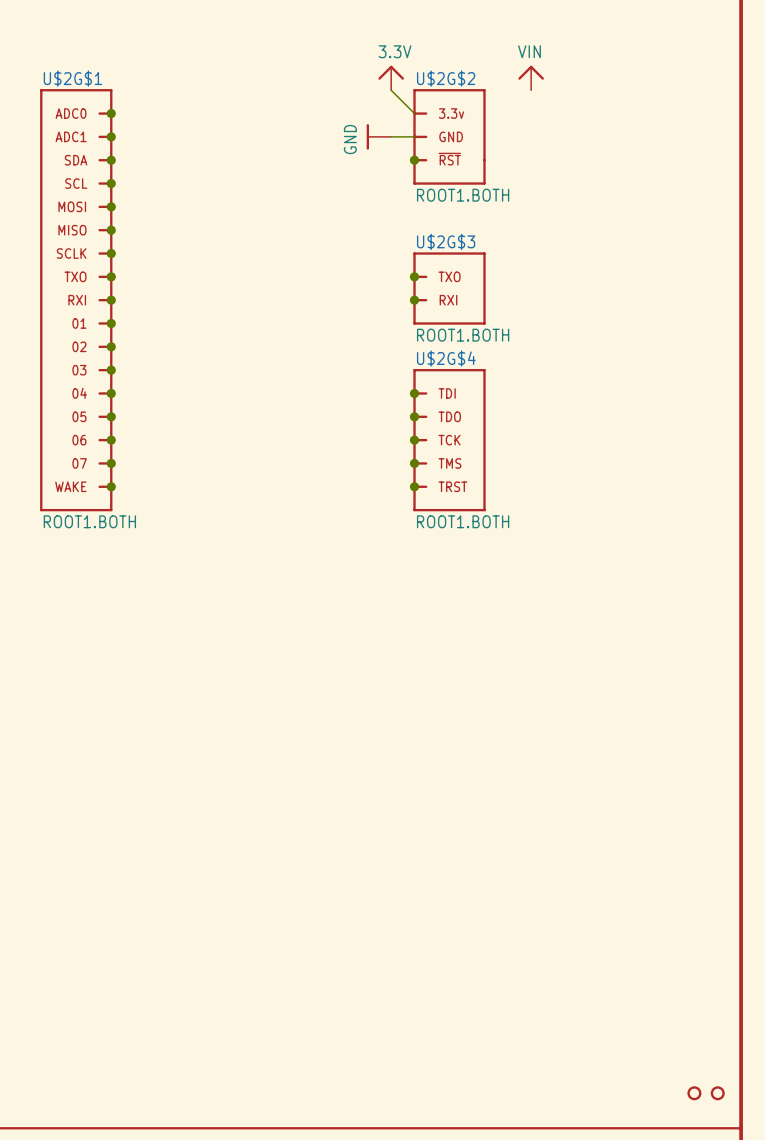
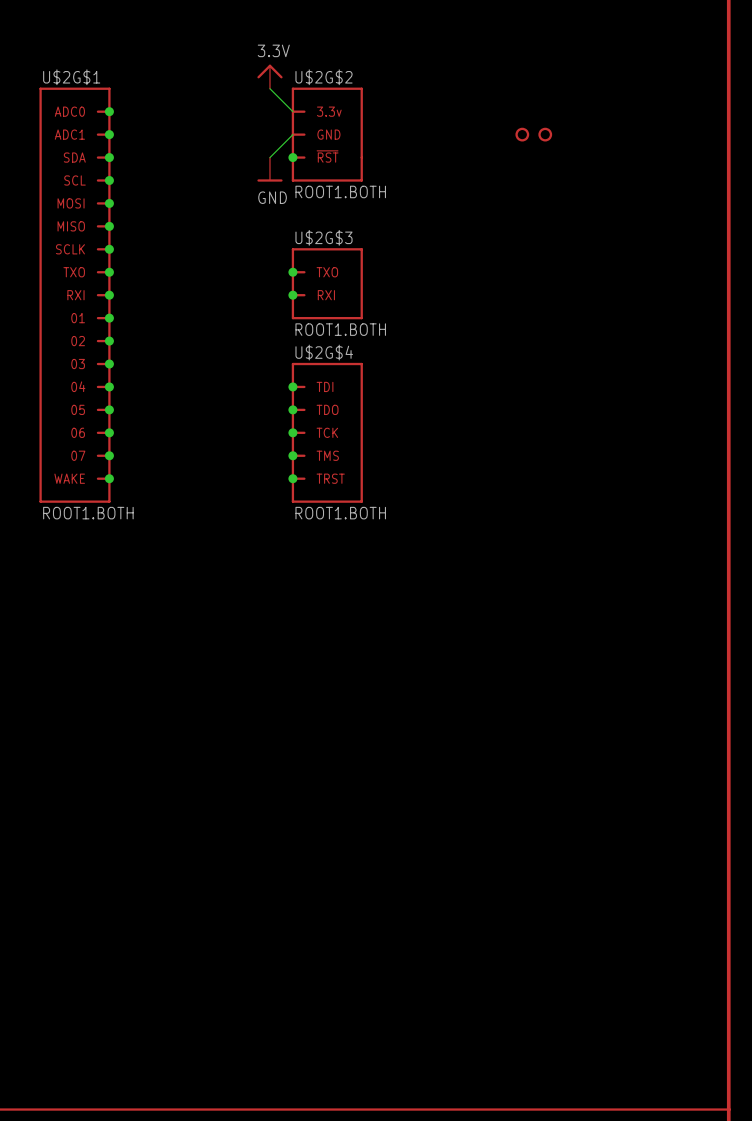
power symbol position: 3.3V (391, 77) -> 3.3V (269, 76)
power symbol: VIN (531, 77) -> none
wire: (391, 90) (414, 113) -> (269, 88) (292, 111)
wire: none -> (292, 134) (269, 157)
power symbol rotation: 0° (367, 136) -> 90° counterclockwise (269, 180)
power symbol position: GND (378, 136) -> GND (269, 169)
wire: (391, 136) (414, 136) -> none
U$2G$2 position: (449, 136) -> (327, 134)
part: none -> (522, 134)
part: none -> (545, 134)
junction: none -> (292, 157)
junction: (414, 160) -> none
junction: none -> (292, 272)
junction: (414, 276) -> none
U$2G$3 position: (449, 288) -> (327, 283)
junction: none -> (292, 295)
junction: (414, 300) -> none
junction: none -> (292, 386)
junction: (414, 393) -> none
junction: none -> (292, 409)
junction: (414, 416) -> none
junction: none -> (292, 432)
junction: (414, 440) -> none
U$2G$4 position: (449, 440) -> (327, 432)
junction: none -> (292, 455)
junction: (414, 463) -> none
junction: none -> (292, 478)
junction: (414, 486) -> none
part: (694, 1093) -> none
part: (717, 1093) -> none

